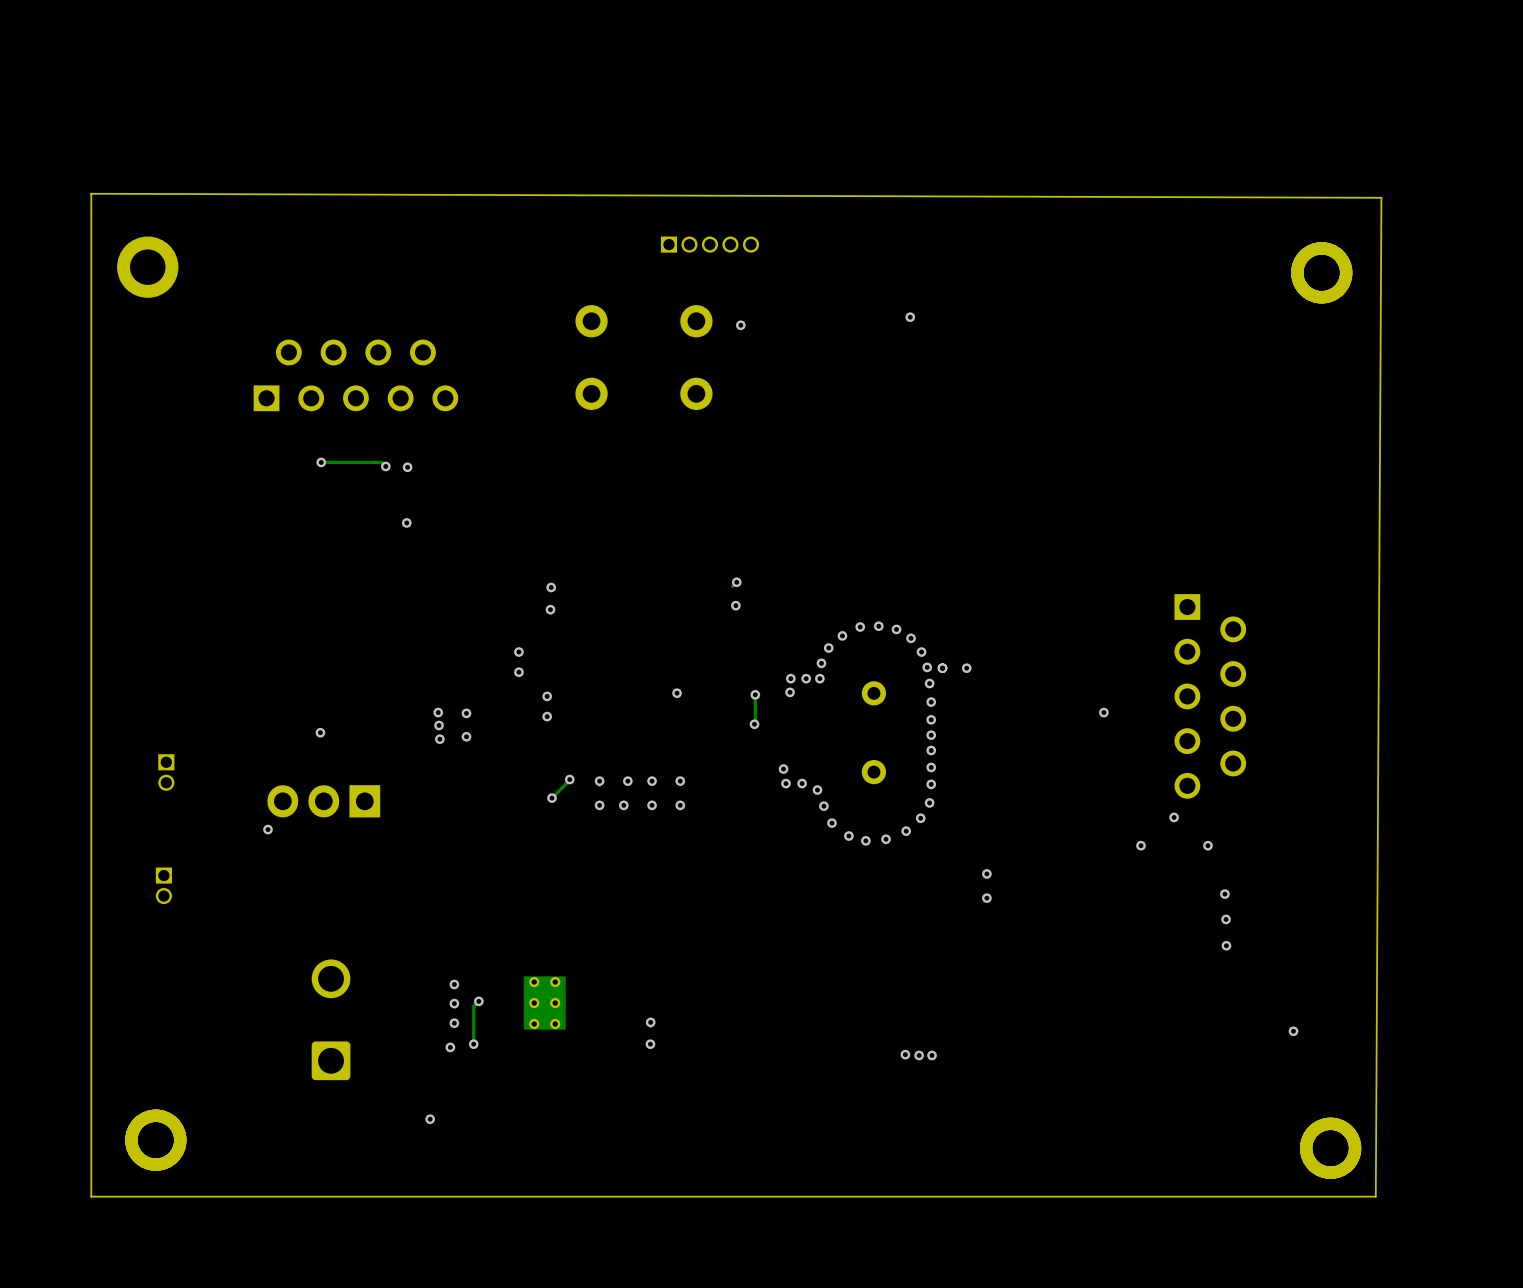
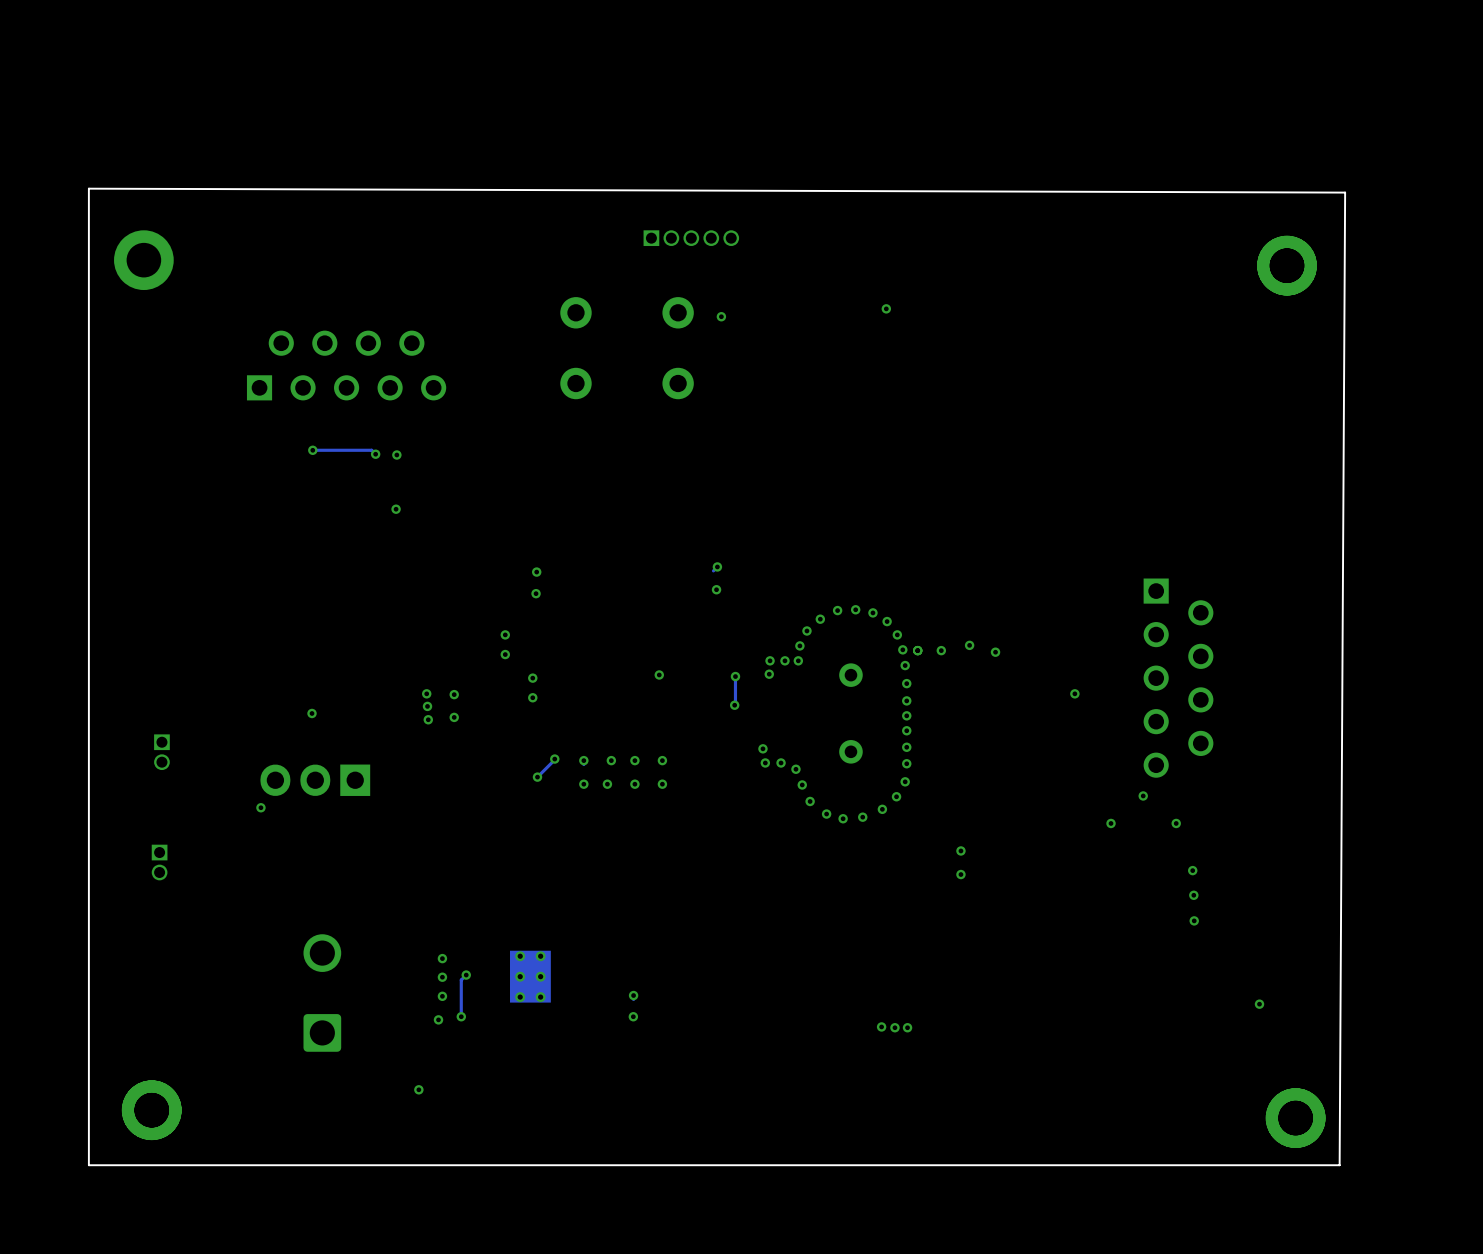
via: none -> (969, 645)
via: none -> (995, 652)

